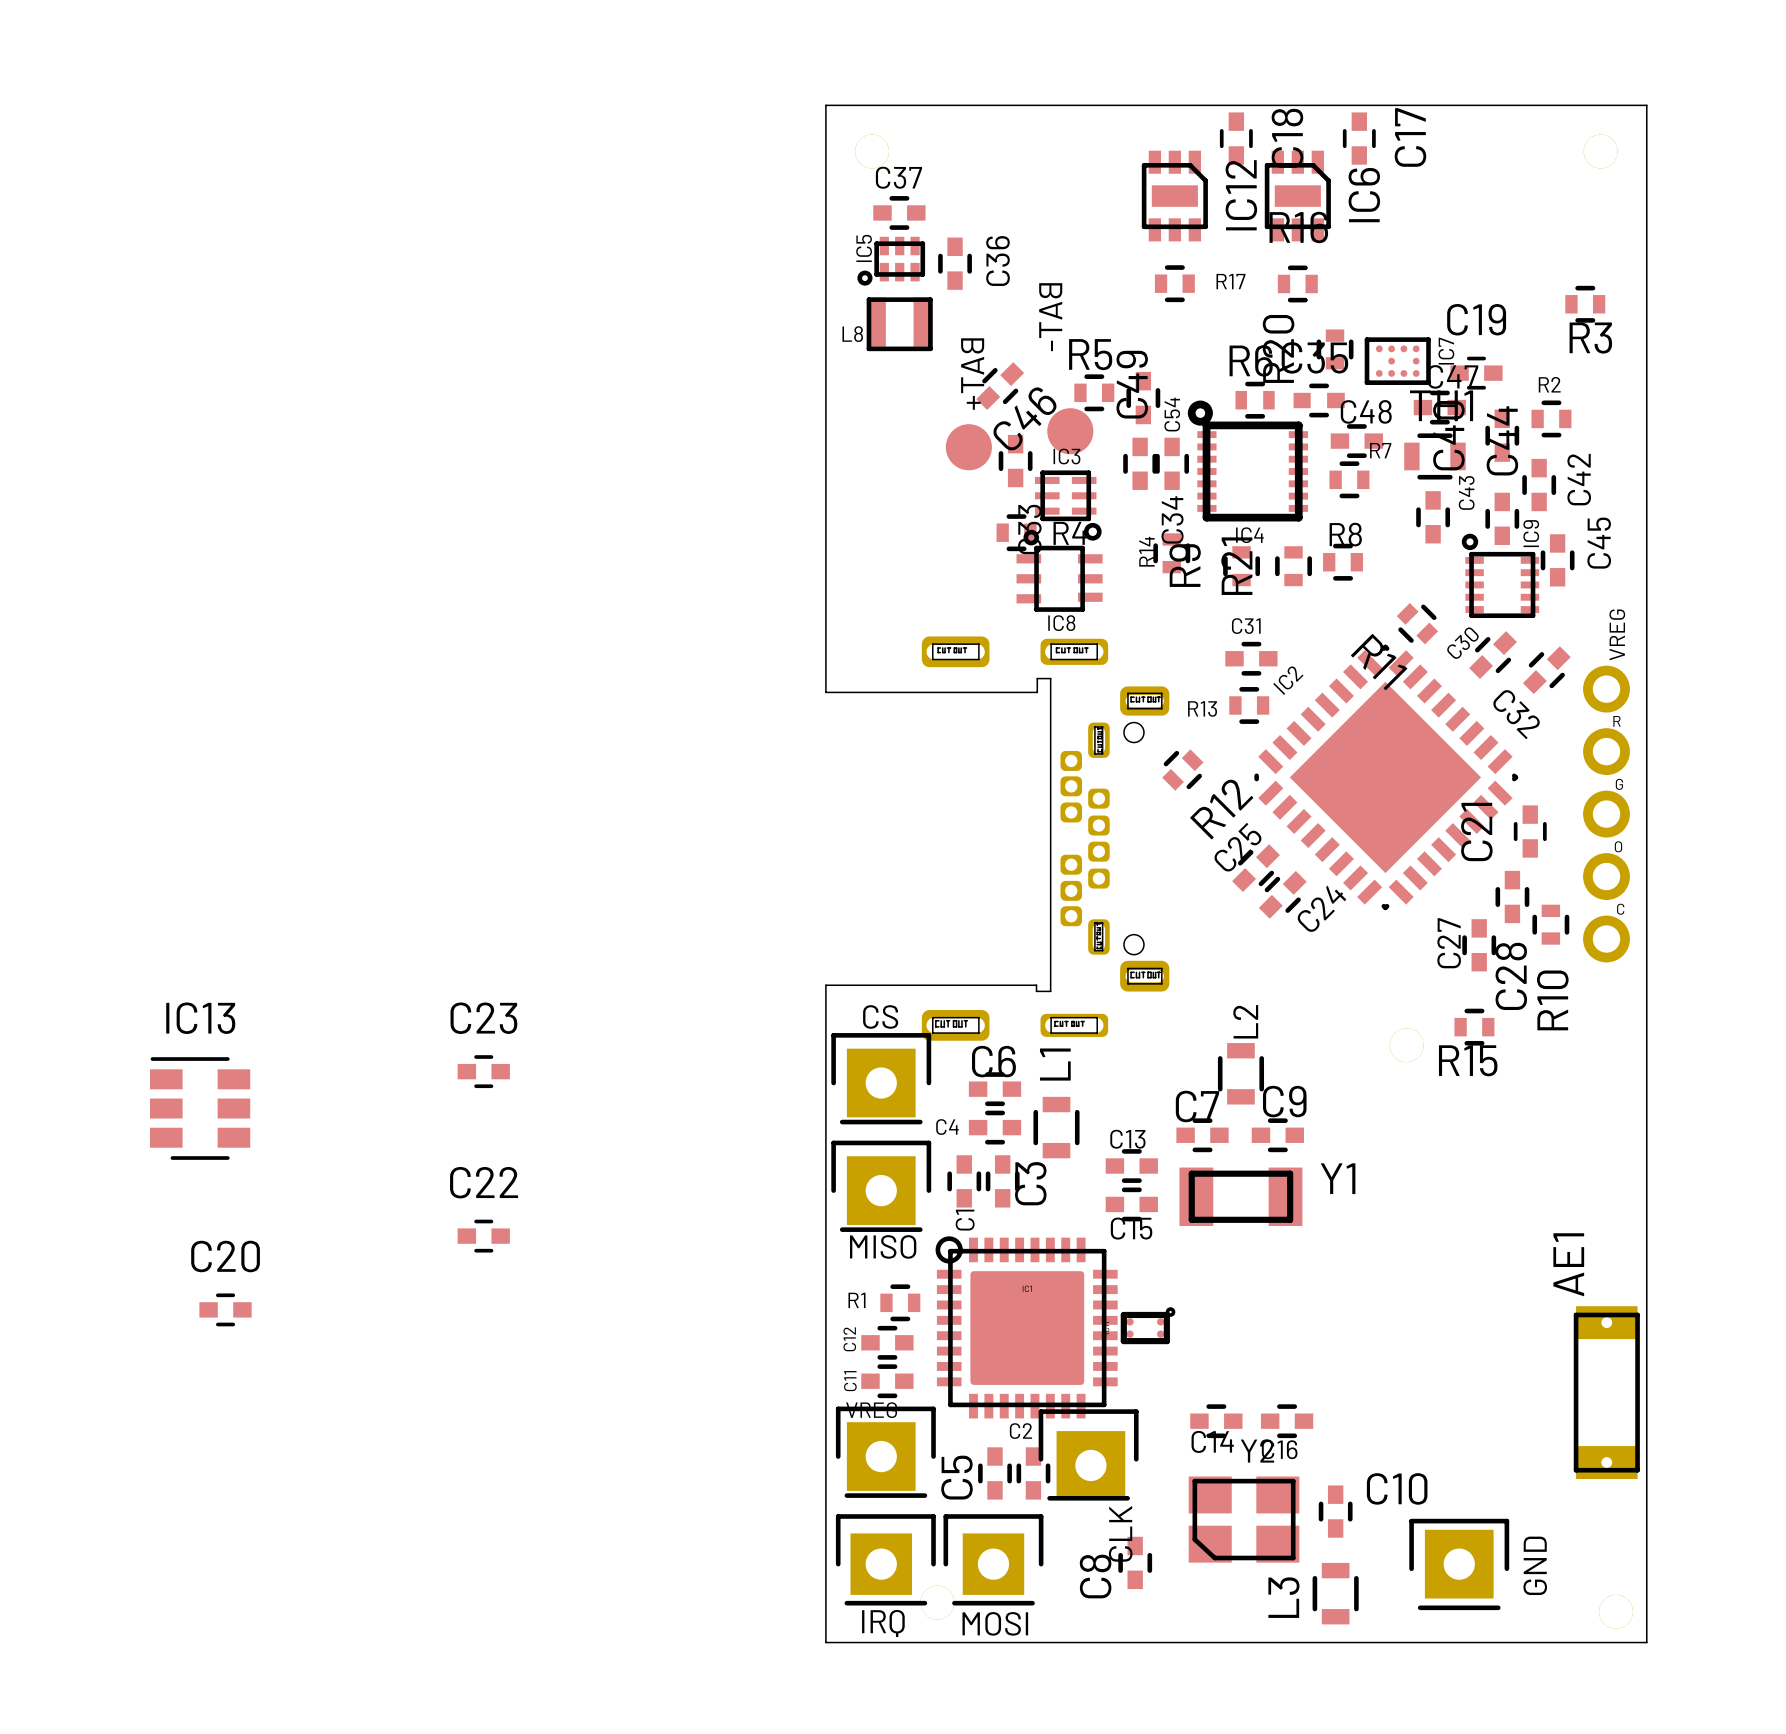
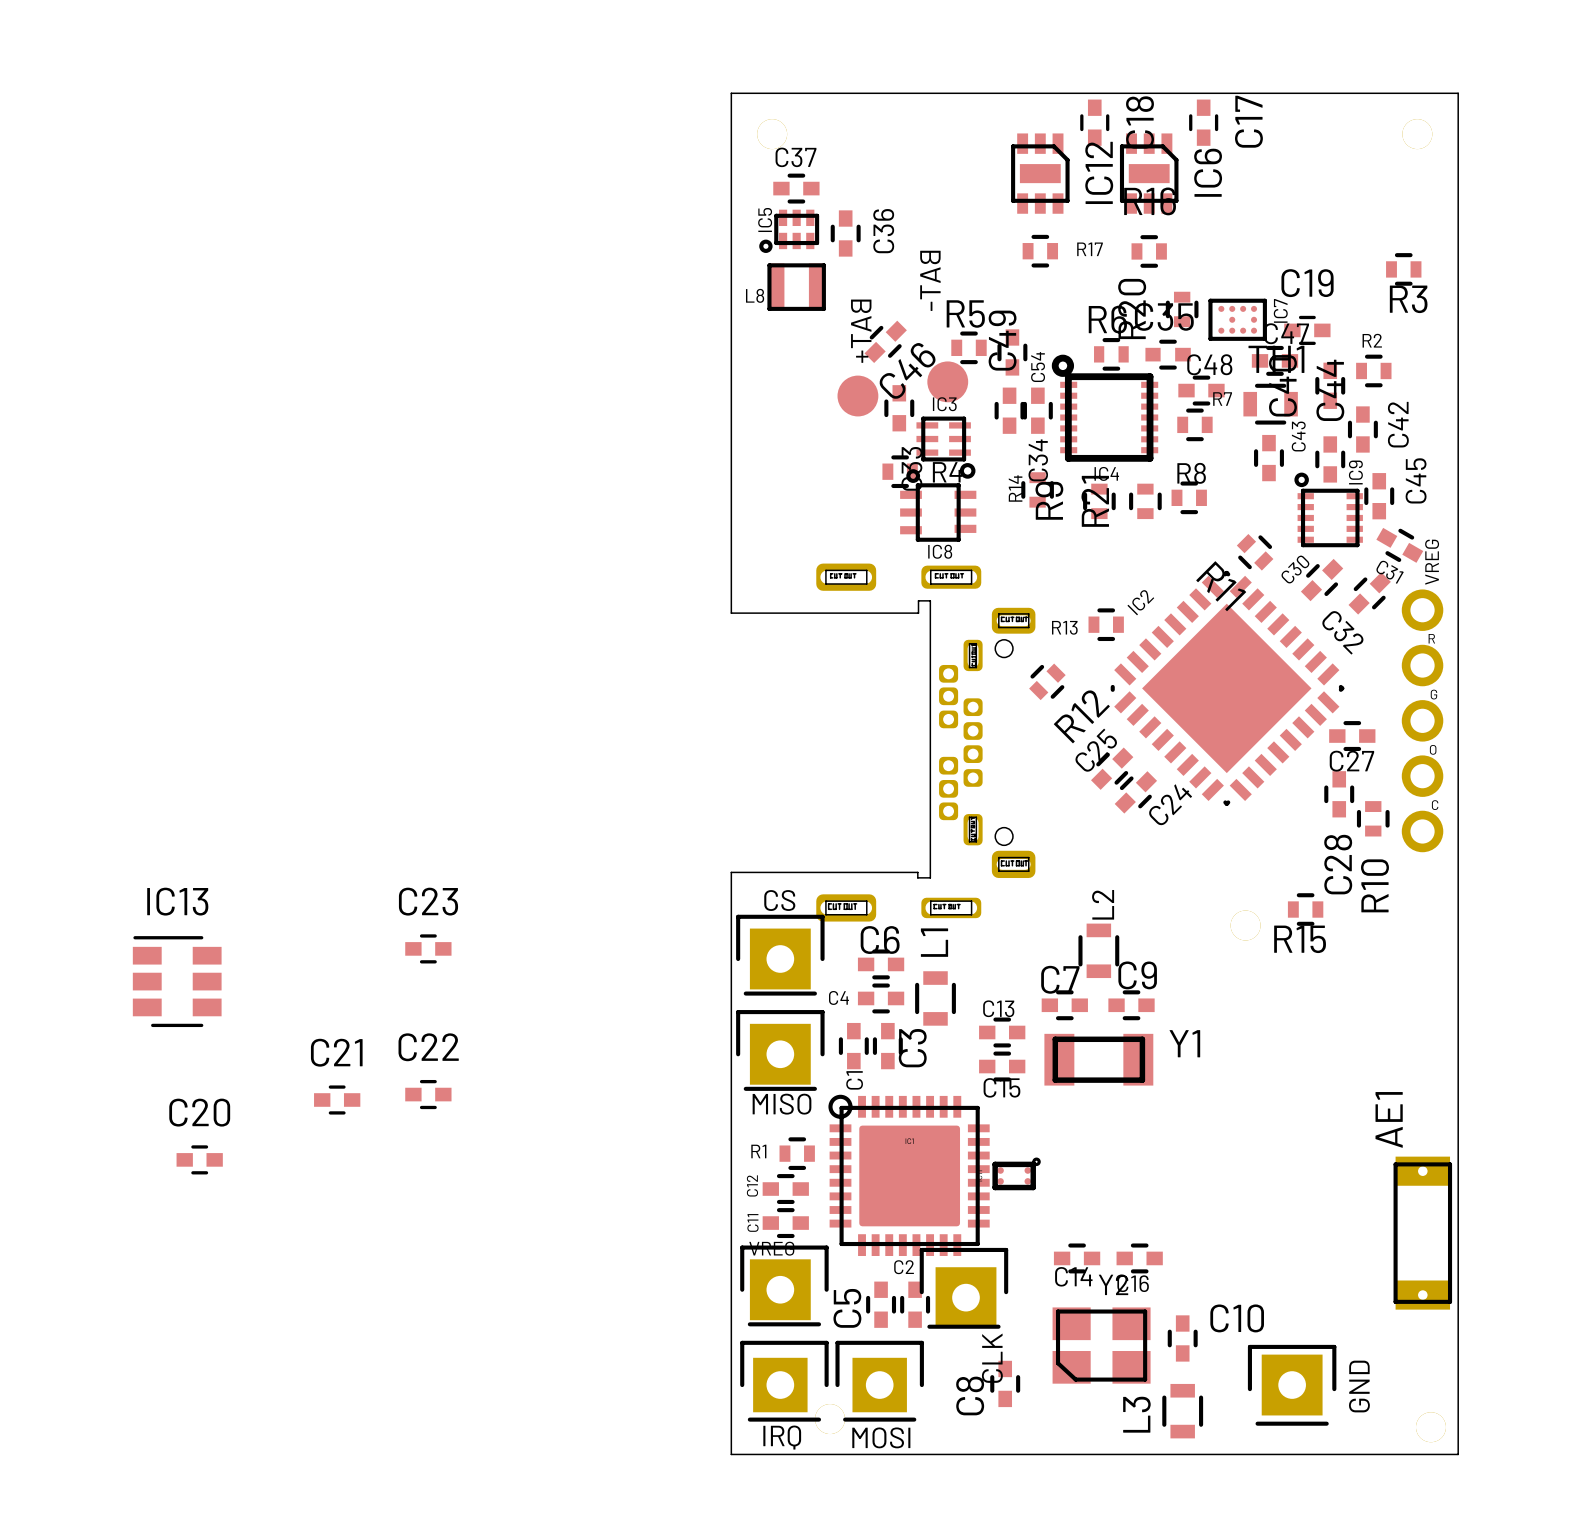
C31 name position: C31 (1246, 626) -> C31 (1390, 572)
C31 rotation: 0° (1251, 658) -> 30° clockwise (1399, 545)
C31 position: (1251, 658) -> (1399, 545)
C21 rotation: 0° (1530, 831) -> 90° clockwise (337, 1099)
C21 position: (1530, 831) -> (337, 1099)
C27 rotation: 0° (1479, 945) -> 90° clockwise (1352, 736)
C27 position: (1479, 945) -> (1352, 736)

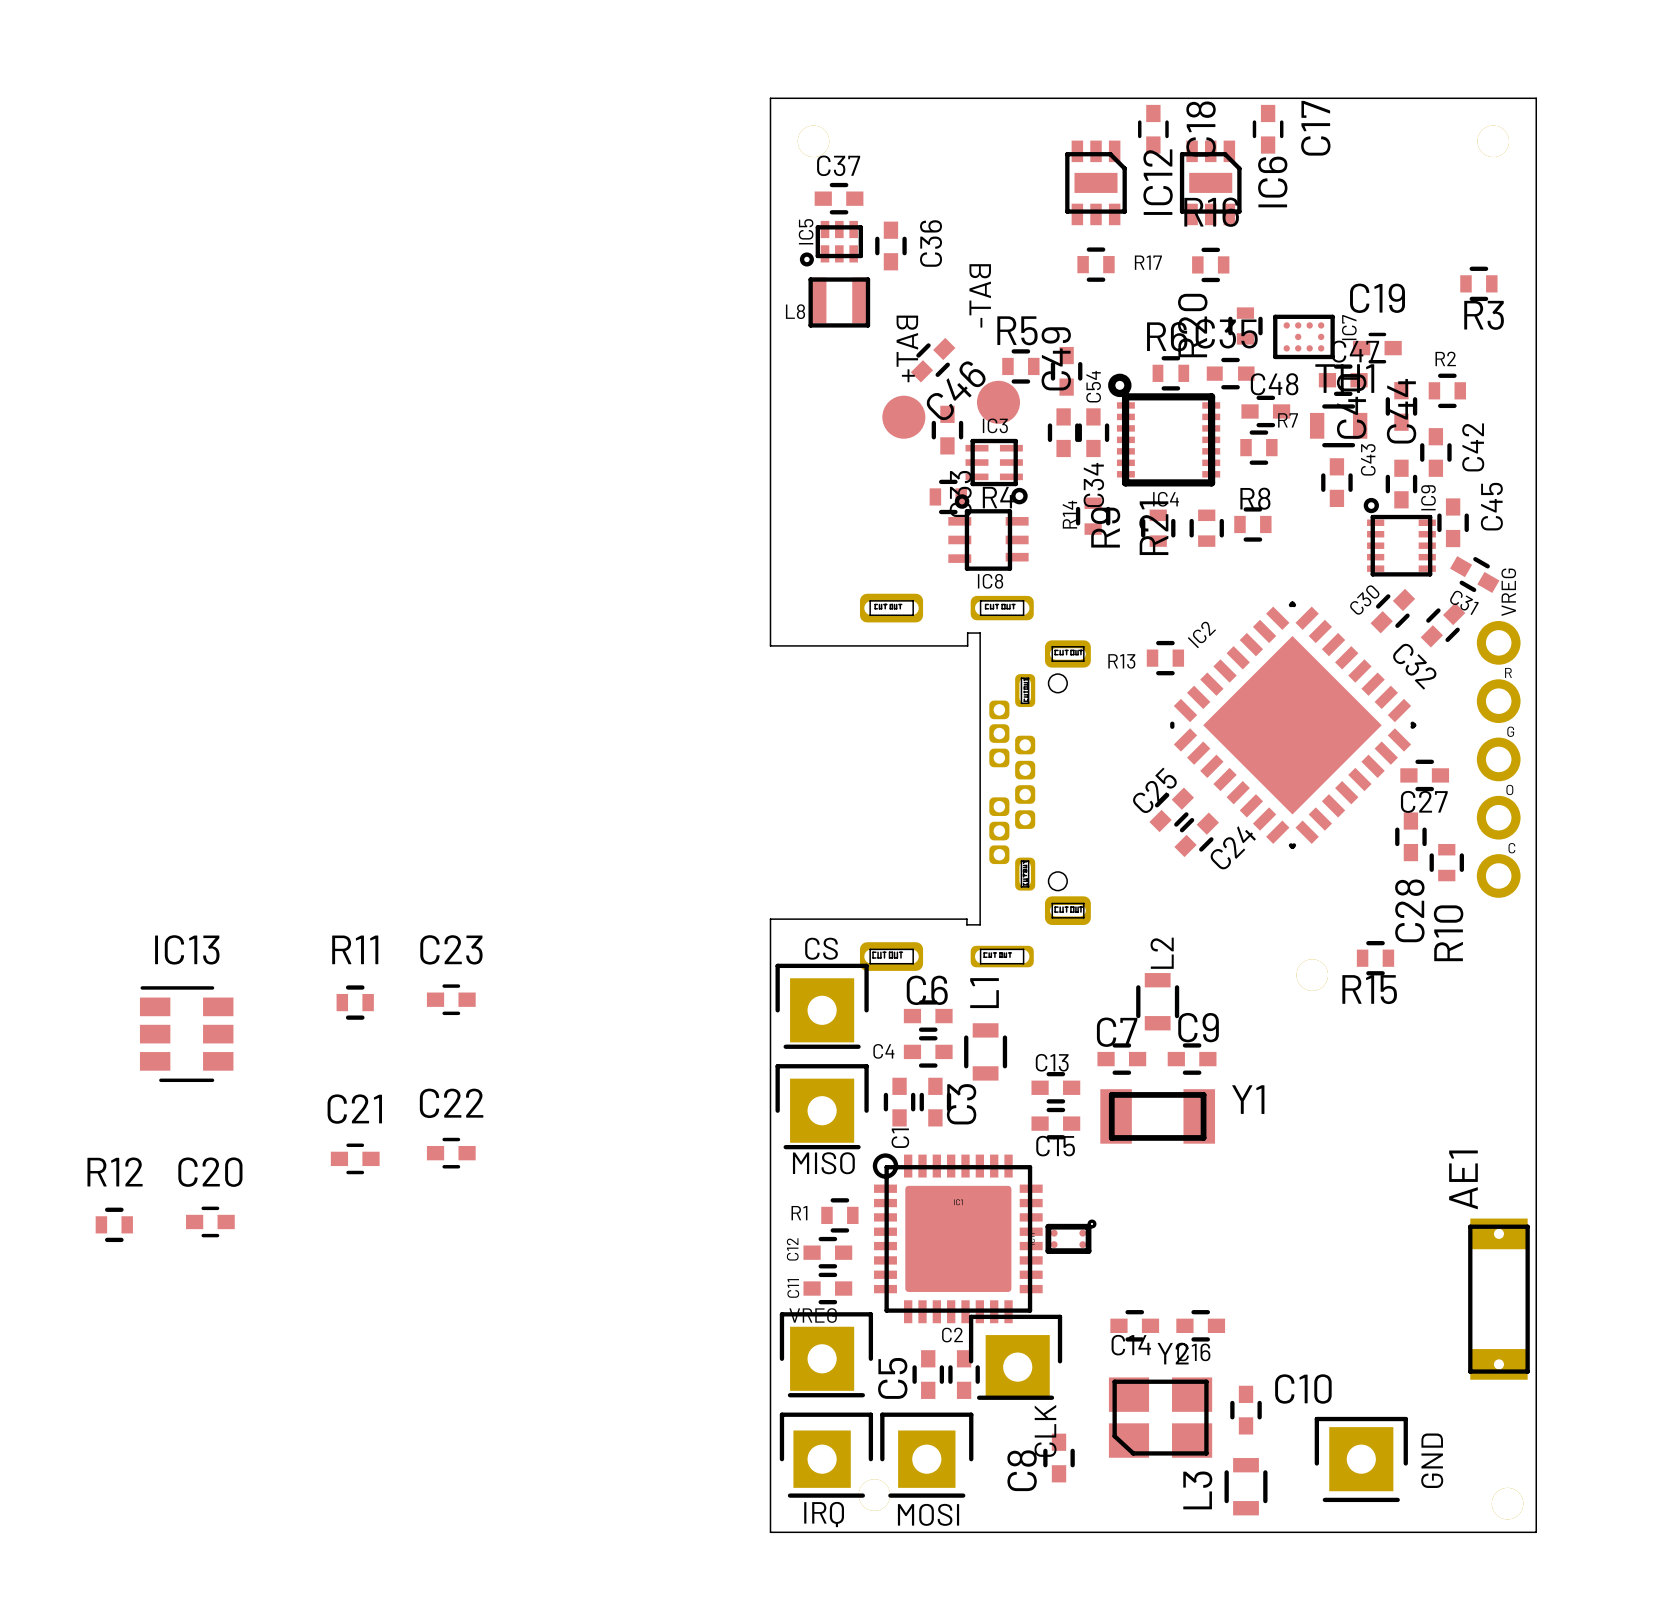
R11 rotation: 0° (1255, 552) -> 45° counterclockwise (355, 1002)
R11 position: (1255, 552) -> (355, 1002)
R11 name position: R11 (1221, 586) -> R11 (355, 949)
R12 rotation: 0° (1047, 681) -> 45° clockwise (114, 1224)
R12 position: (1047, 681) -> (114, 1224)
R12 name position: R12 (1081, 716) -> R12 (115, 1171)

